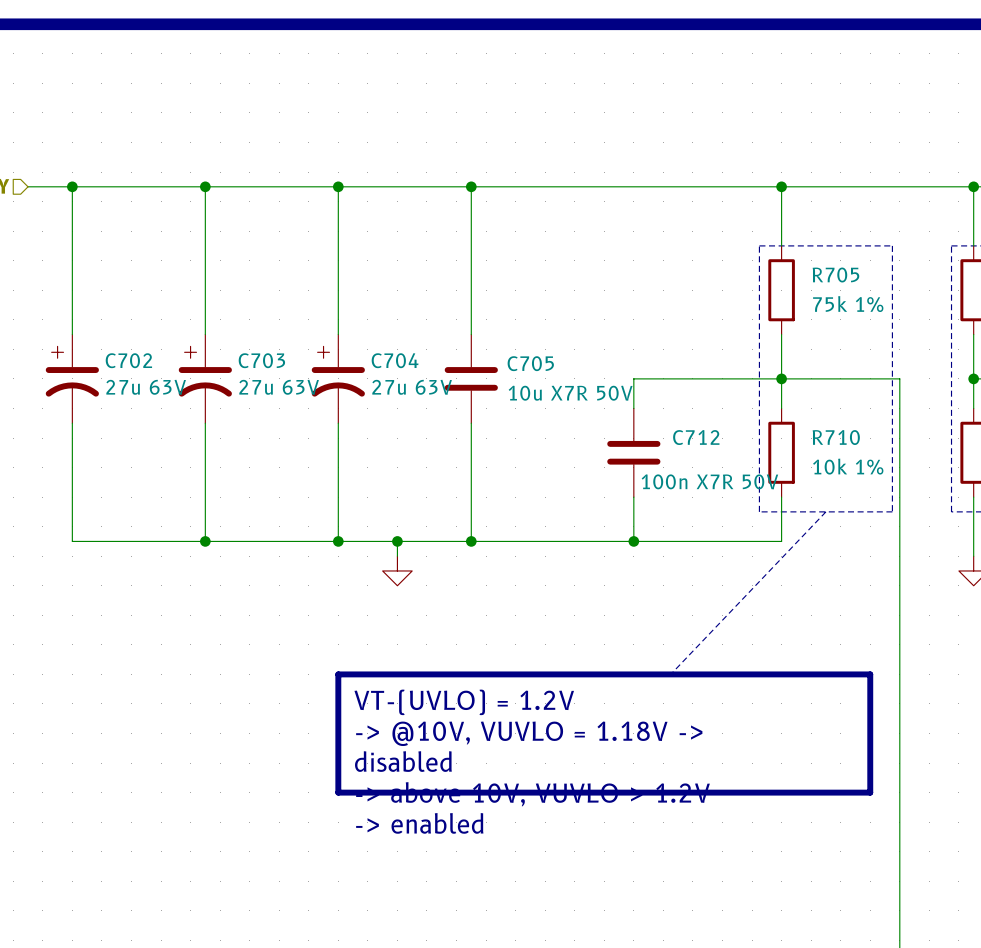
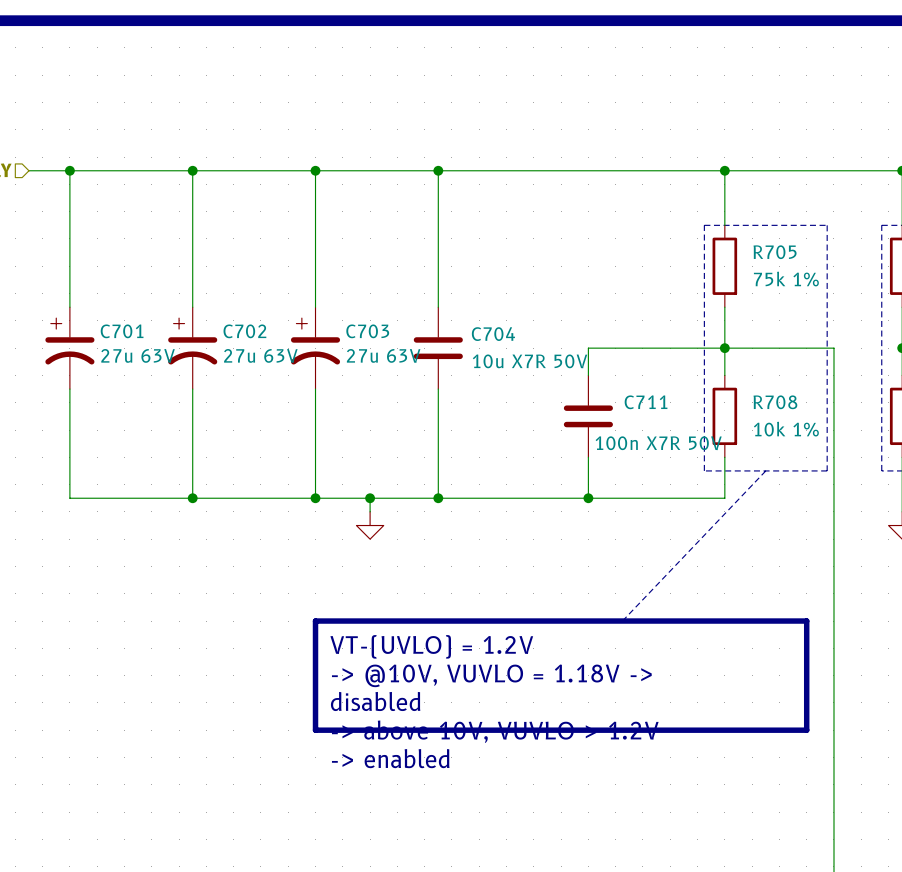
C702 name: C702 (128, 360) -> C701 (122, 331)
C703 name: C703 (261, 360) -> C702 (244, 331)
C704 name: C704 (395, 360) -> C703 (367, 331)
C705 name: C705 (530, 363) -> C704 (493, 334)
C712 name: C712 (696, 437) -> C711 (646, 402)
R710 name: R710 (836, 437) -> R708 (775, 402)

